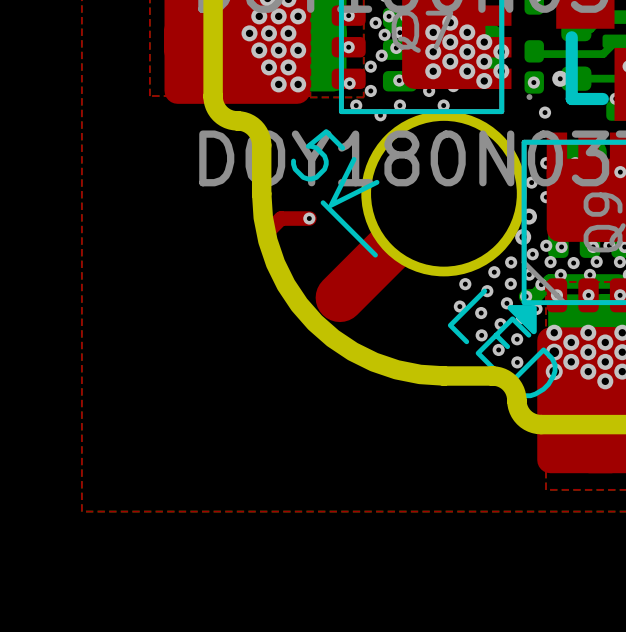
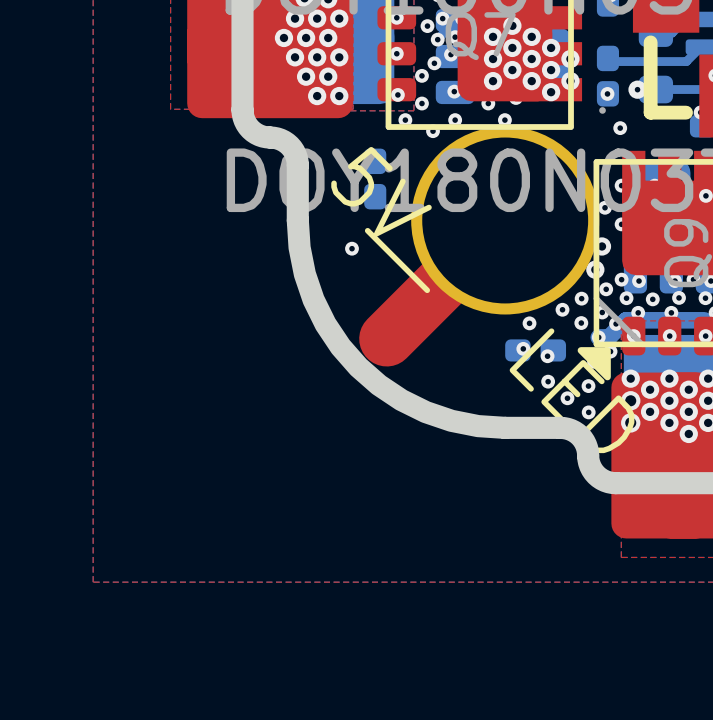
part: none -> (375, 179)
top track: (309, 218) (281, 218) (269, 229) -> none
via: (487, 291) -> none
via: (506, 303) -> none
part: none -> (535, 350)
via: (500, 324) -> none

